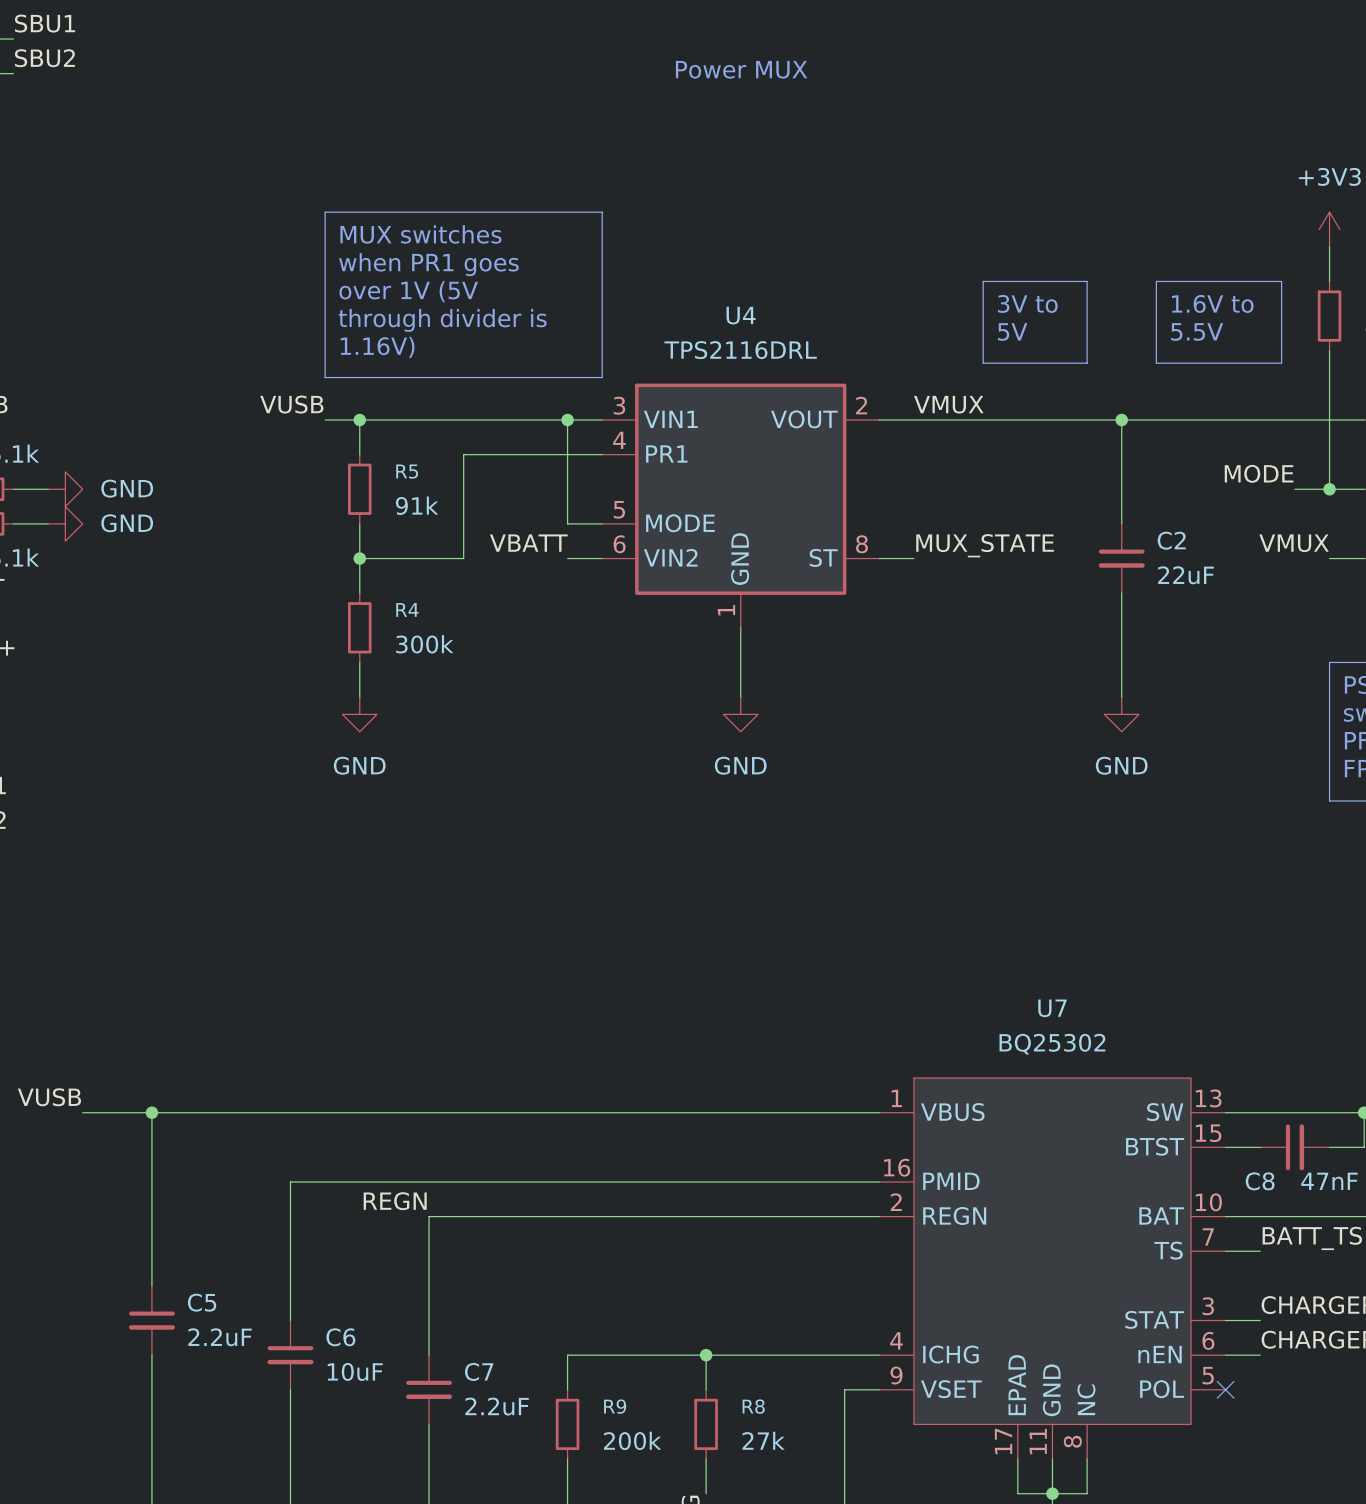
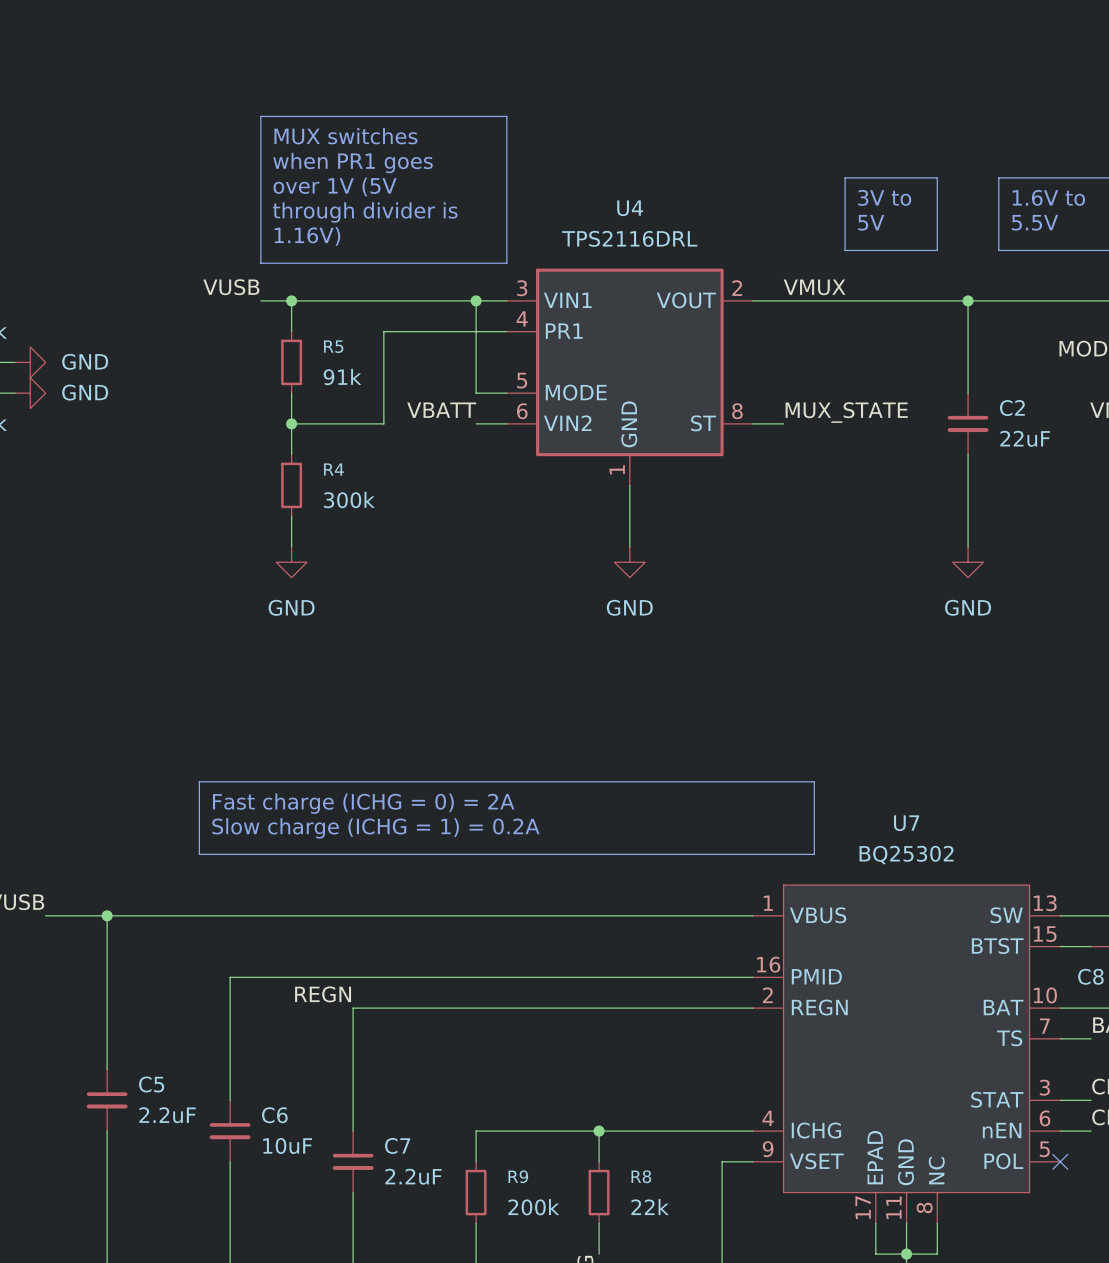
line: none -> (199, 781) (814, 781) (814, 854) (199, 854) (199, 781)
text: none -> Fast charge (ICHG = 0) = 2A (363, 803)
text: none -> Slow charge (ICHG = 1) = 0.2A (375, 828)
R8 value: 27k (763, 1440) -> 22k (650, 1207)

